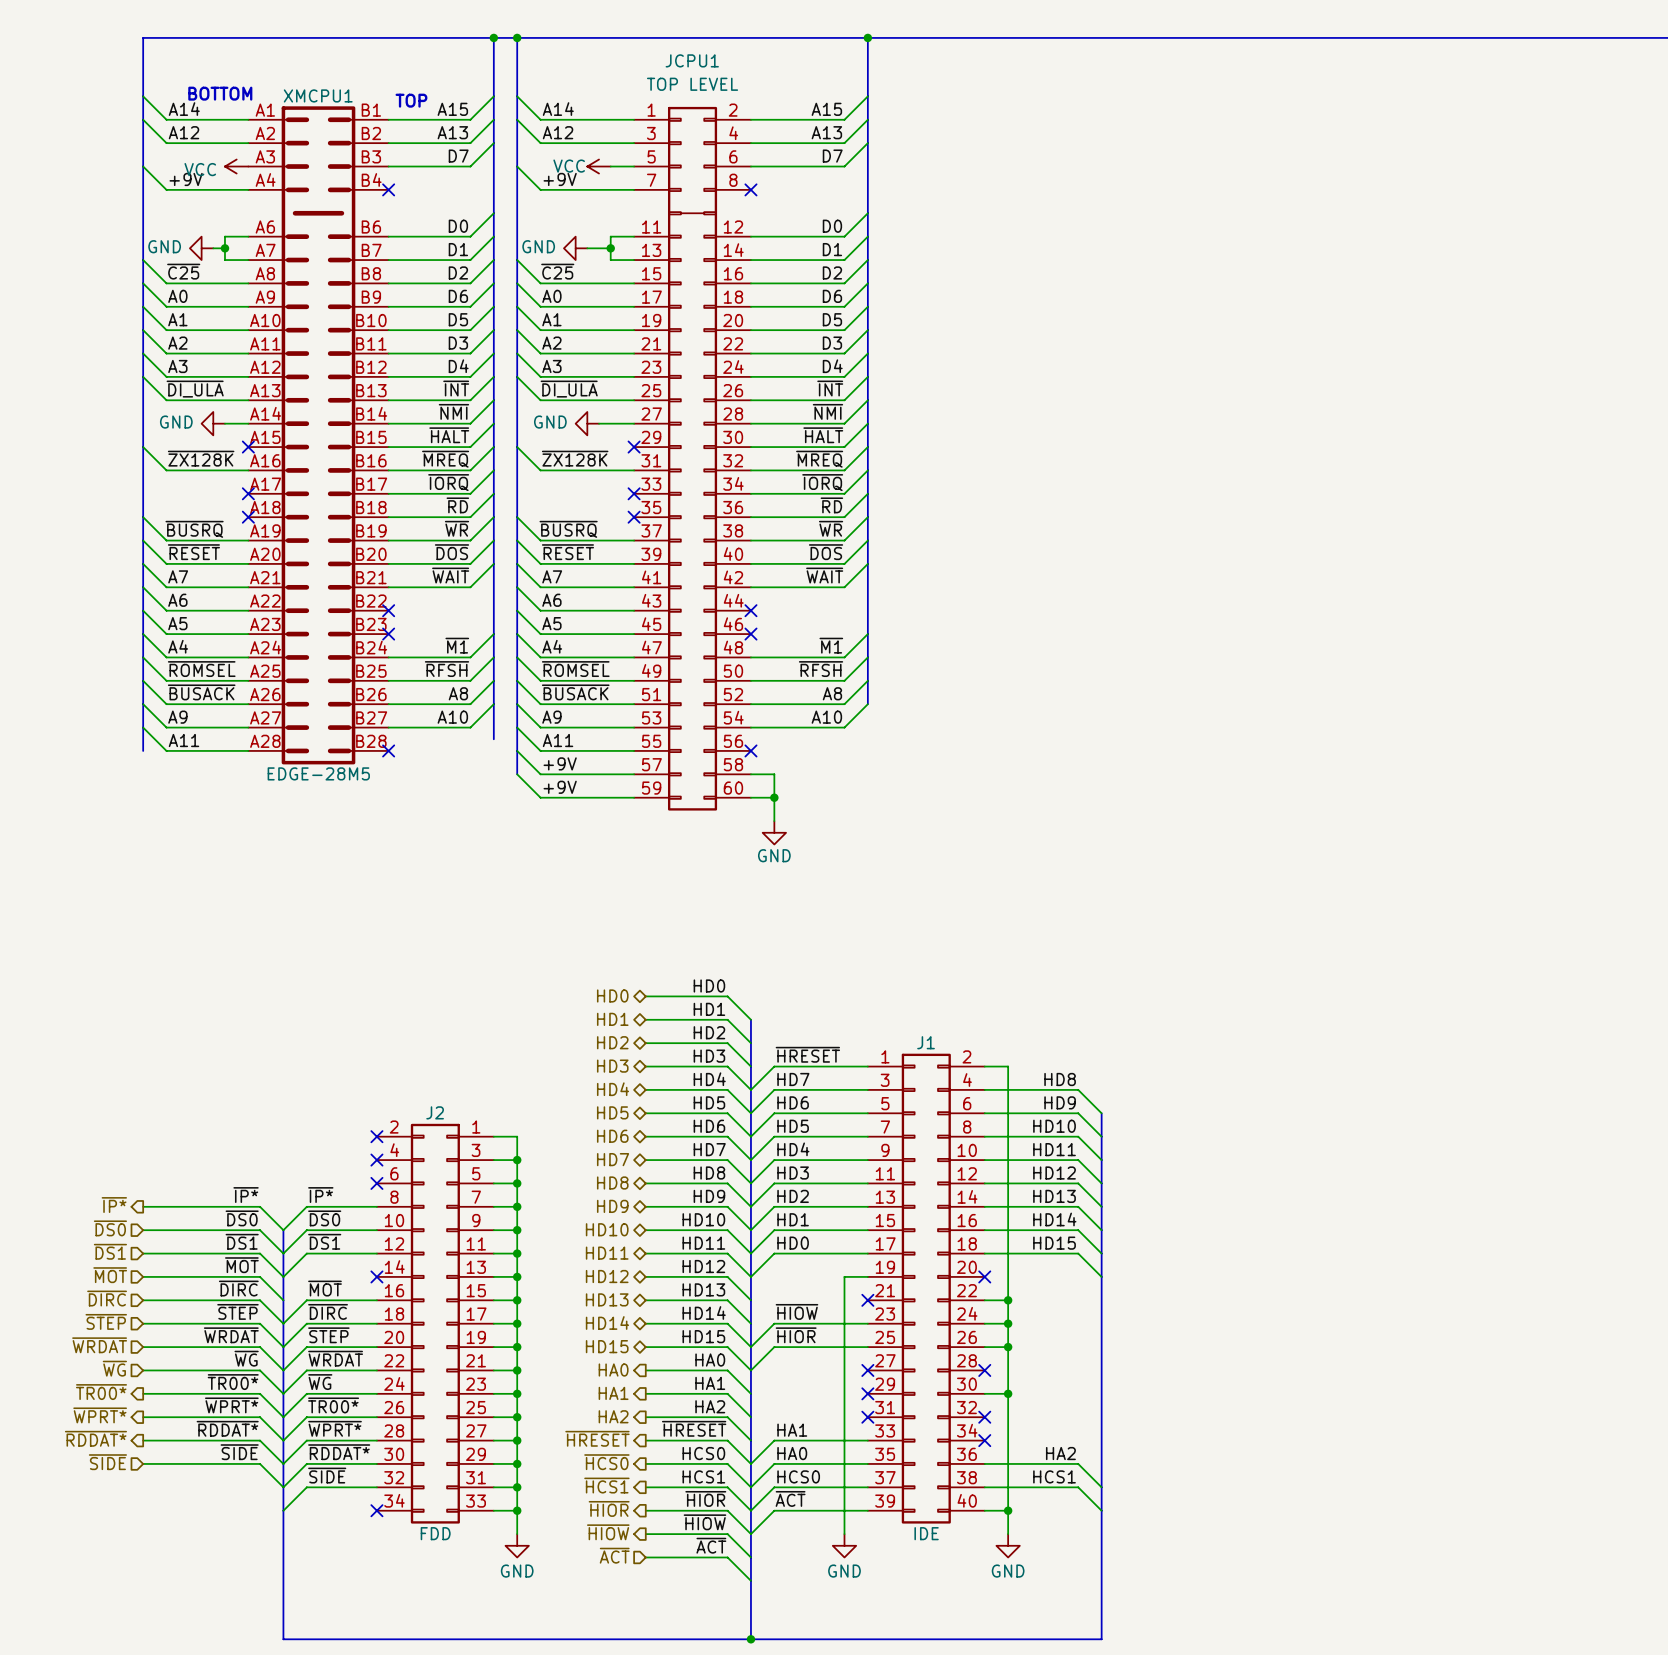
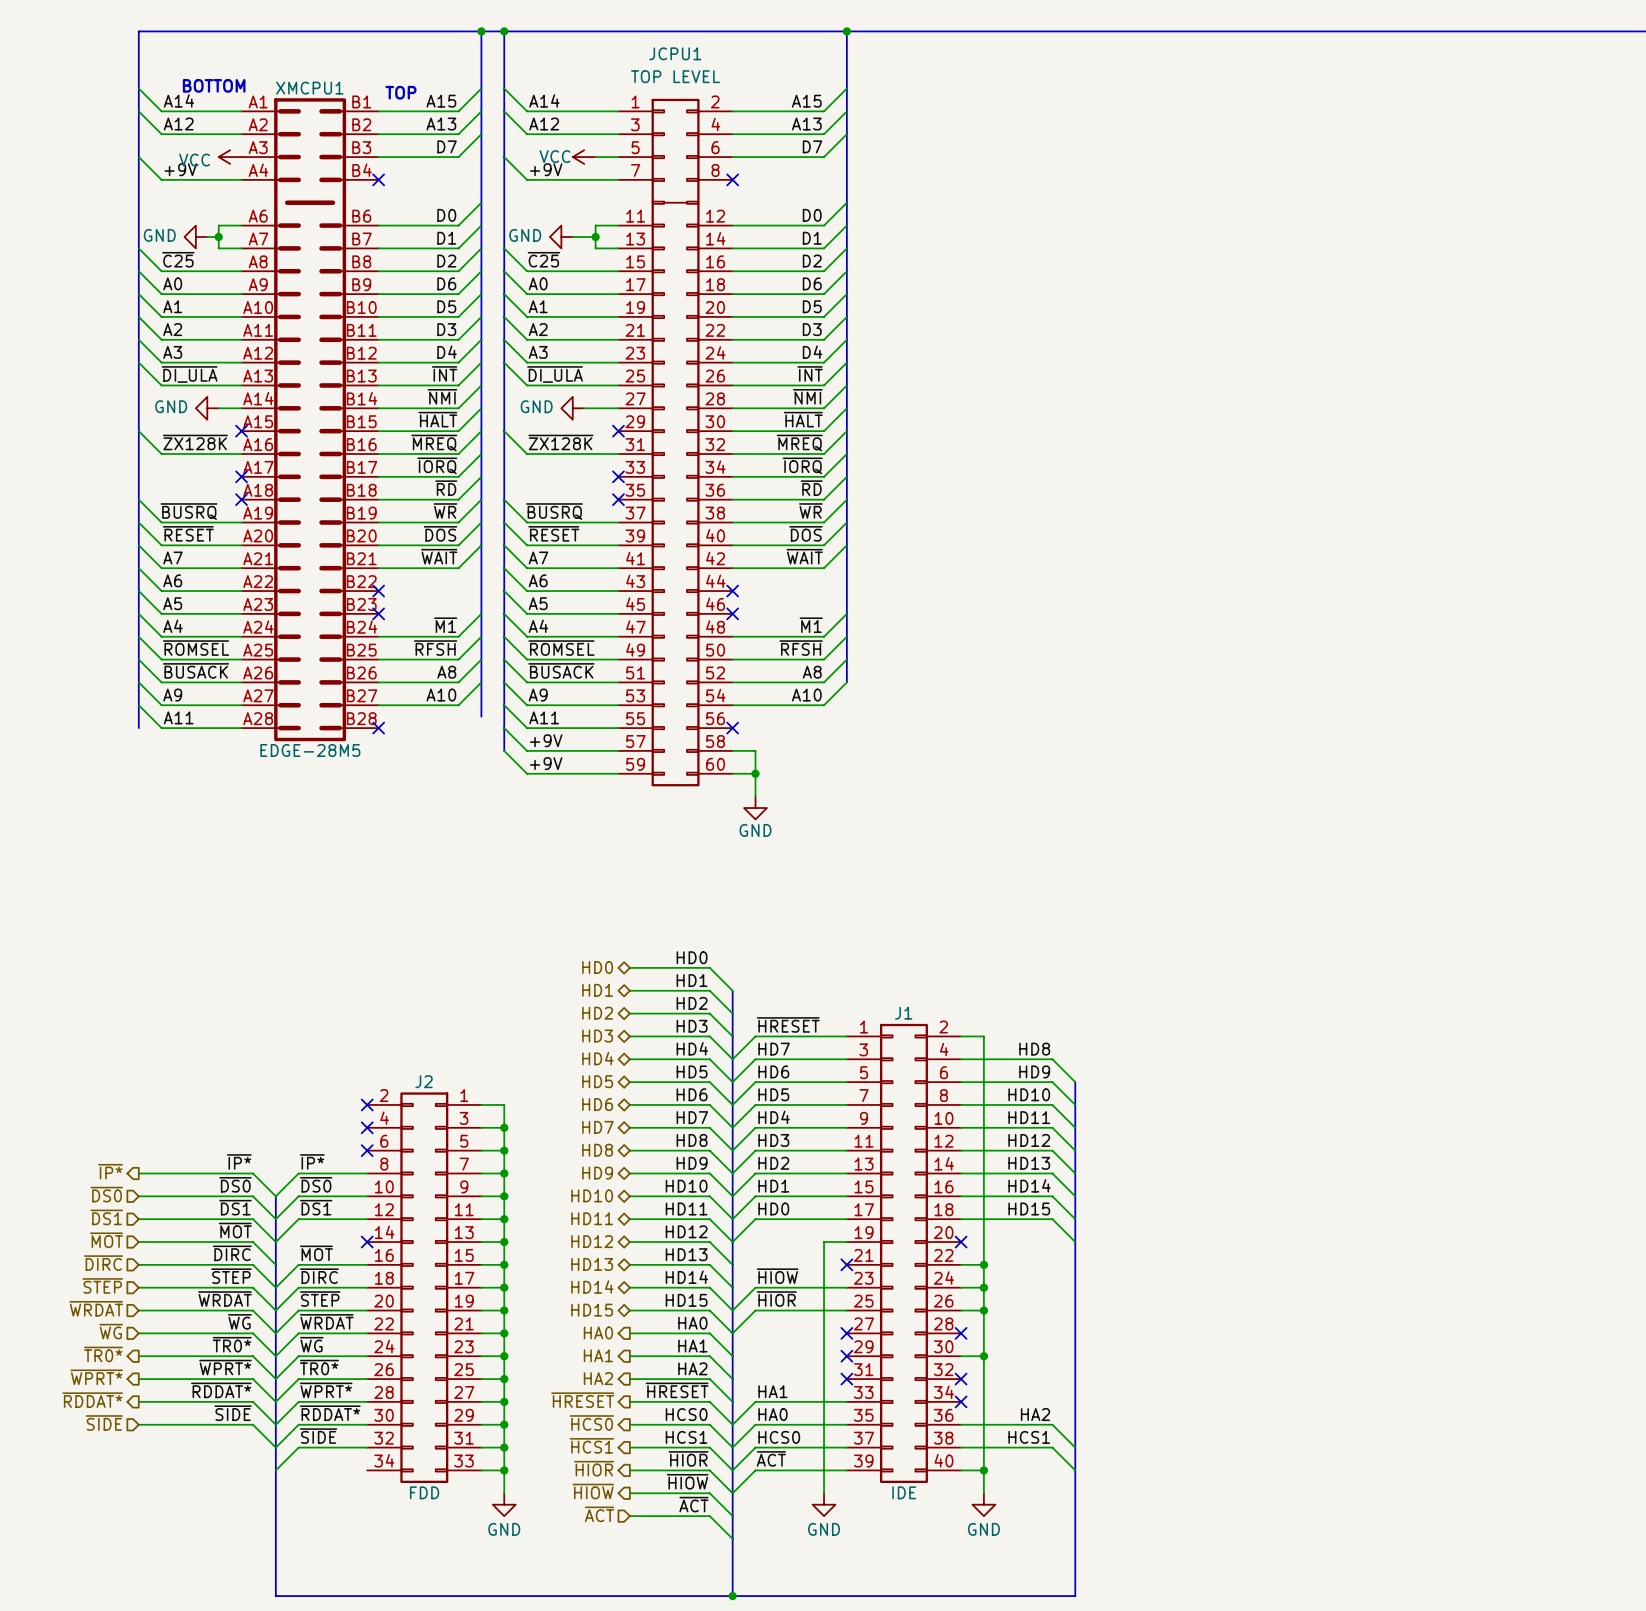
label: ~{TR00*} (233, 1382) -> ~{TR0*} (232, 1344)
hierarchical label: ~{TR00*} (101, 1392) -> ~{TR0*} (103, 1354)
label: ~{TR00*} (333, 1405) -> ~{TR0*} (319, 1367)
no-connect mark: (376, 1510) -> none

